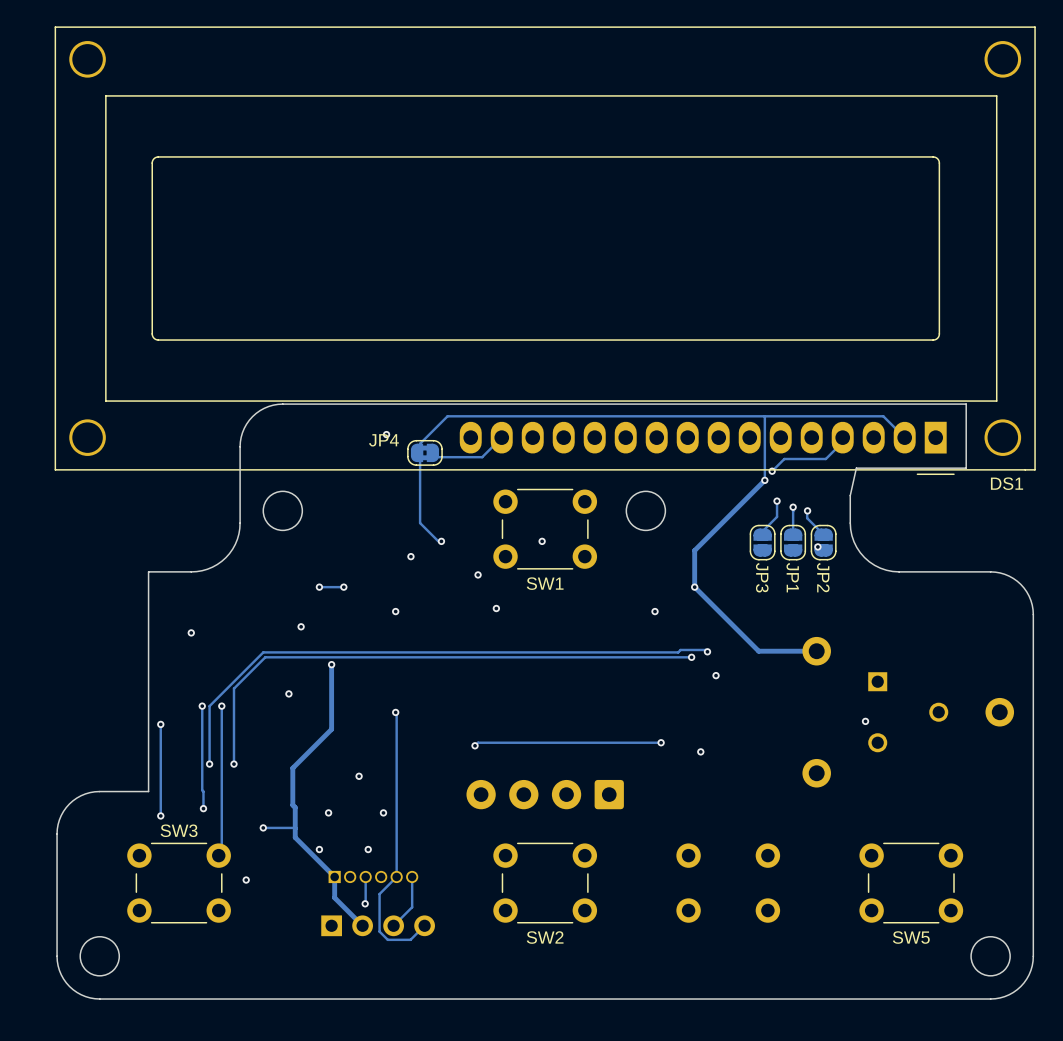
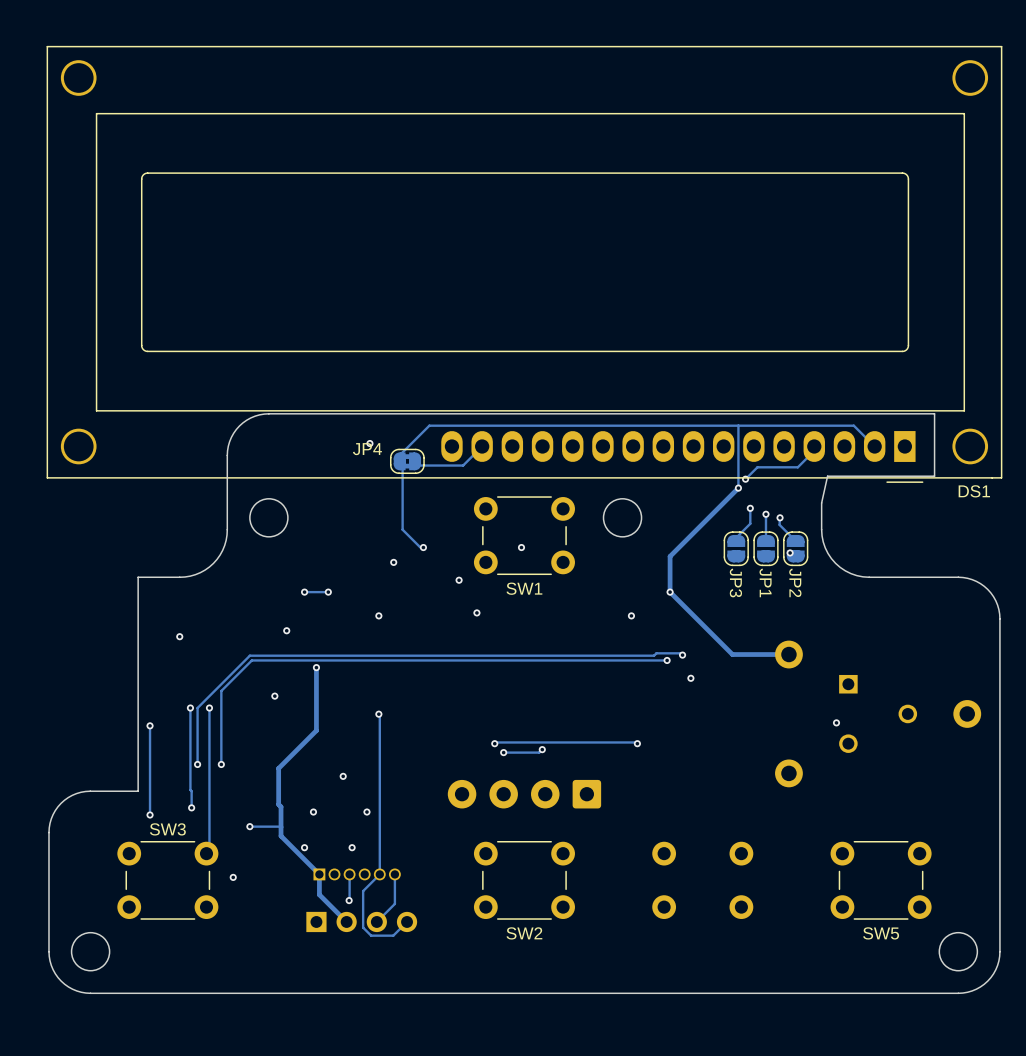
via: none -> (494, 743)
track: (661, 742) (478, 742) (475, 745) -> (637, 743) (494, 743)
via: (475, 745) -> none
track: none -> (542, 749) (539, 752) (503, 752)
via: none -> (542, 749)
via: none -> (503, 752)
via: (700, 751) -> none

